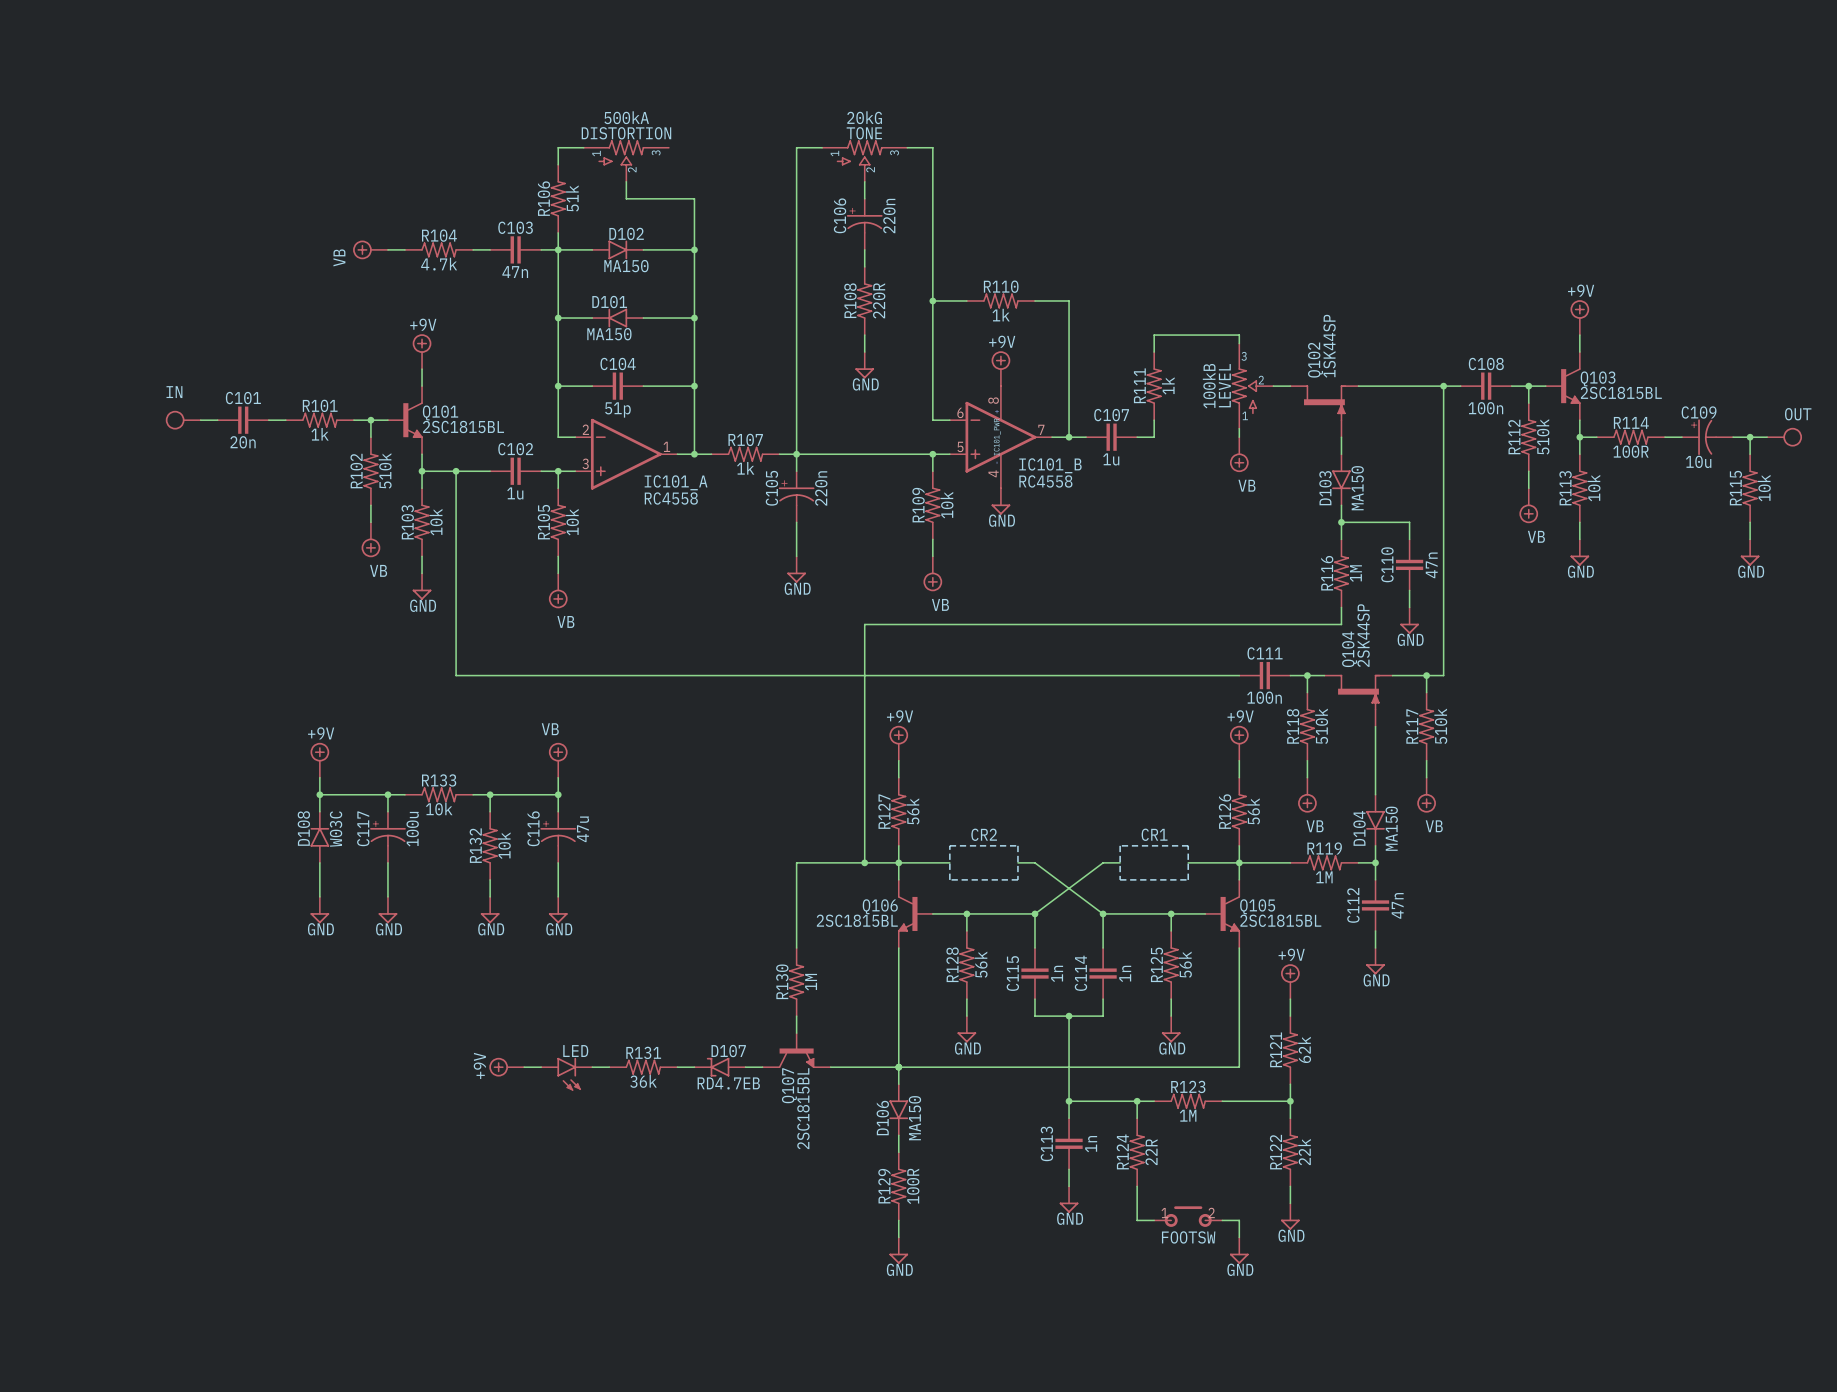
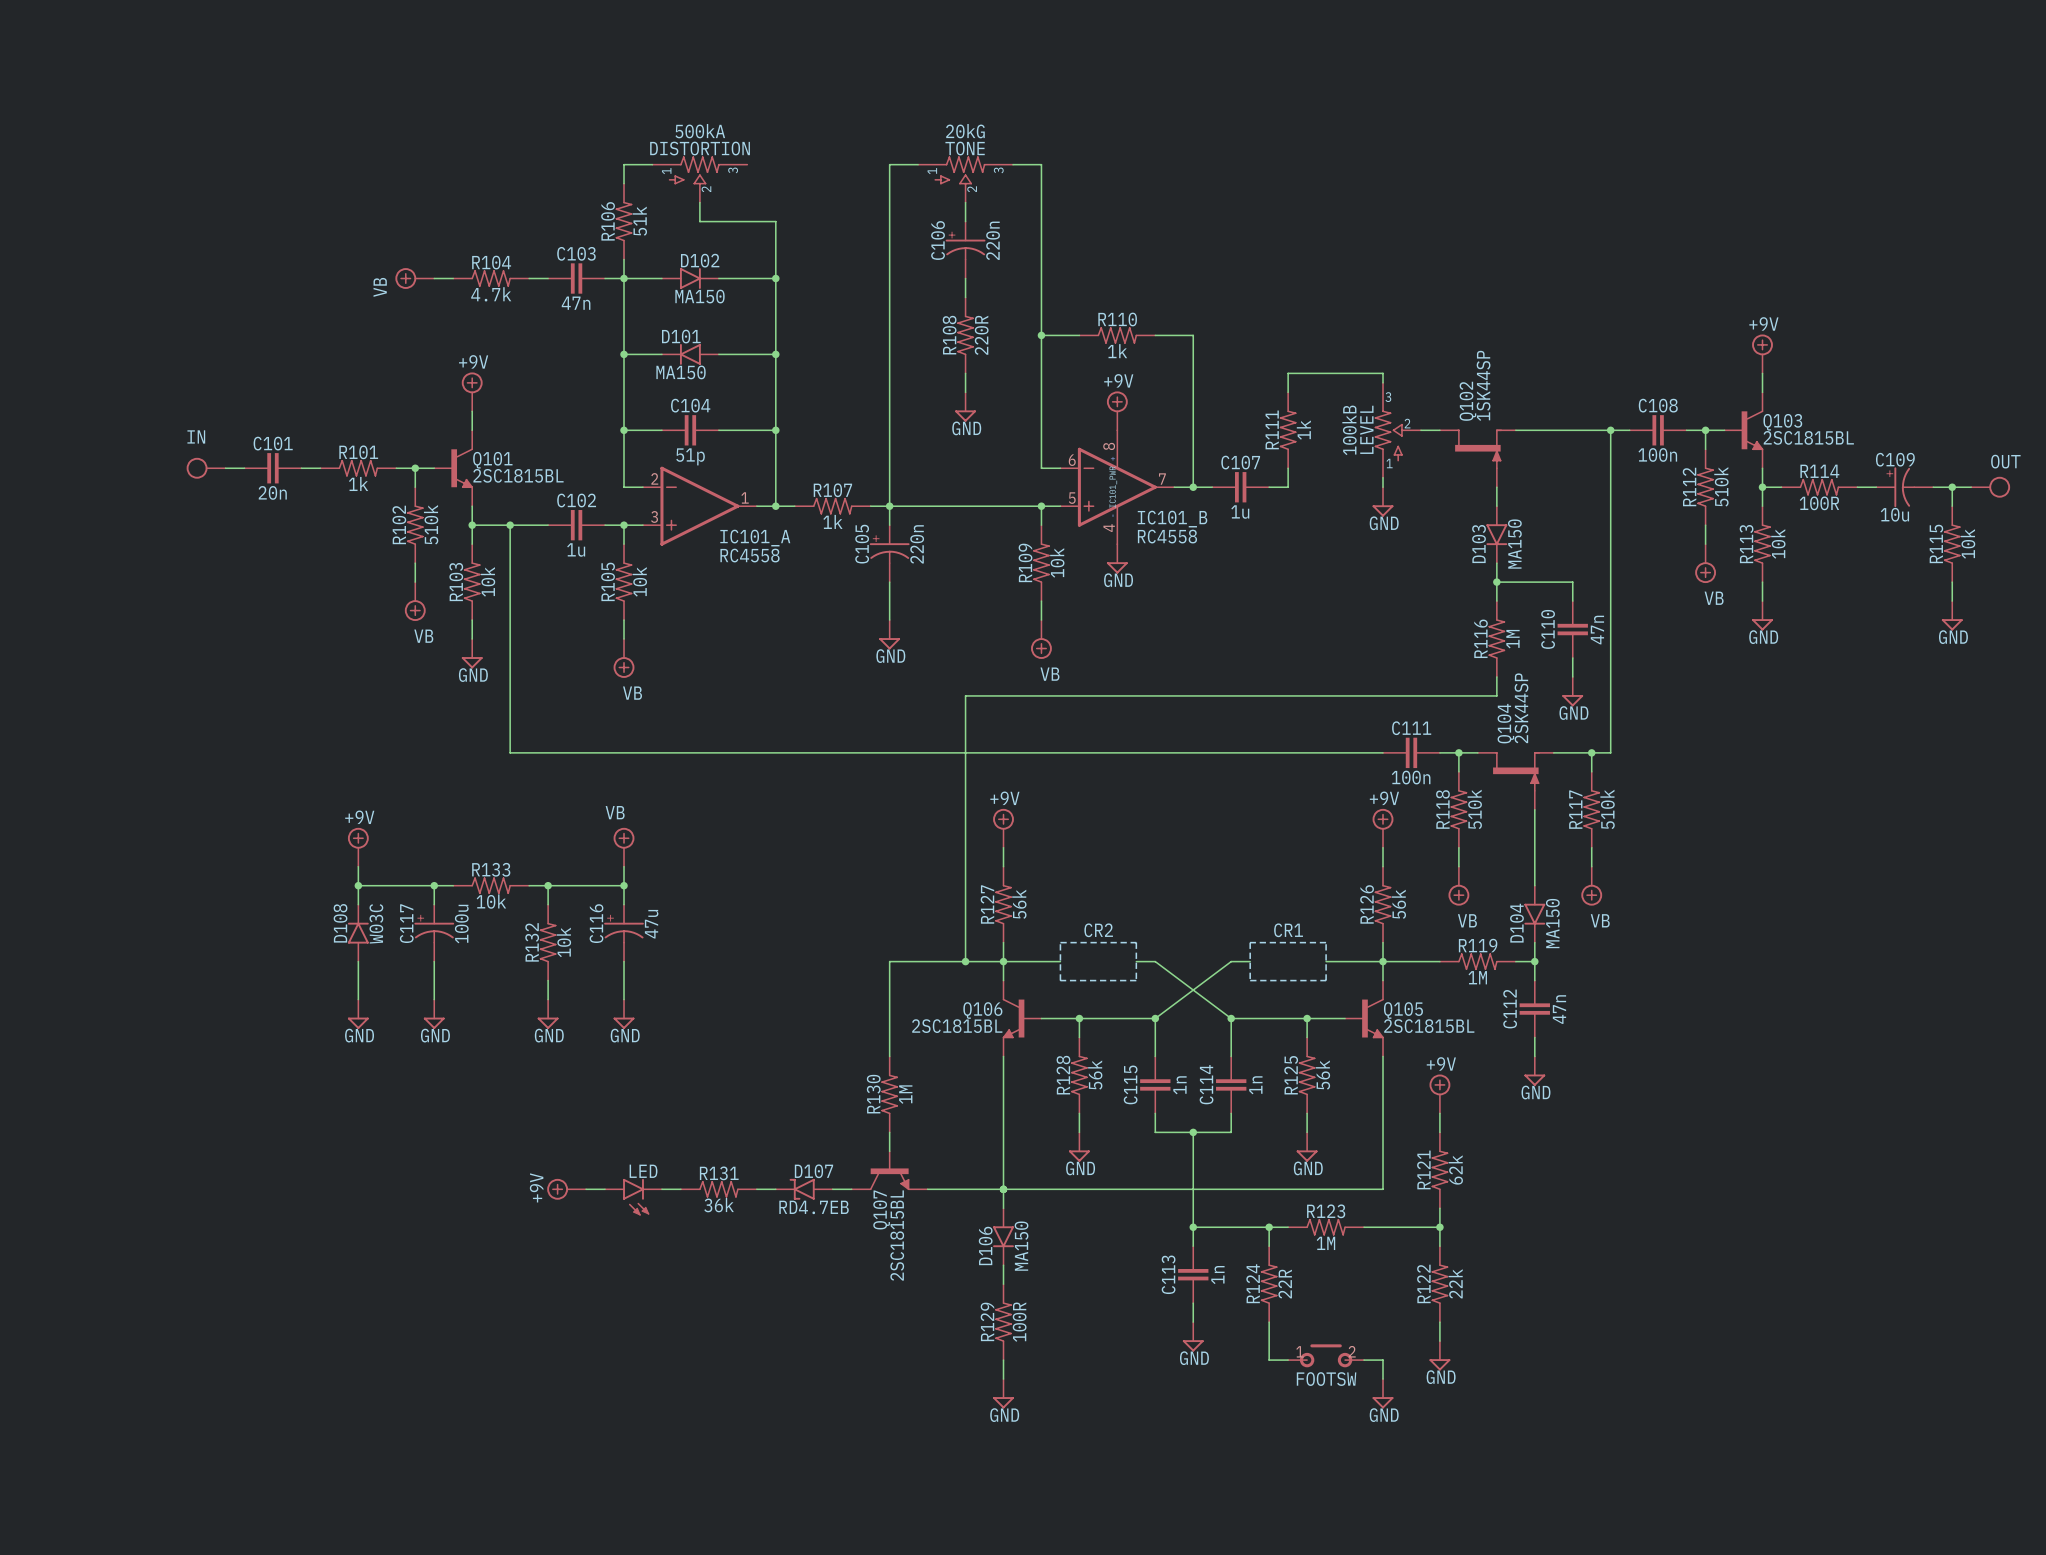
power symbol: VB (1239, 454) -> GND (1383, 501)

